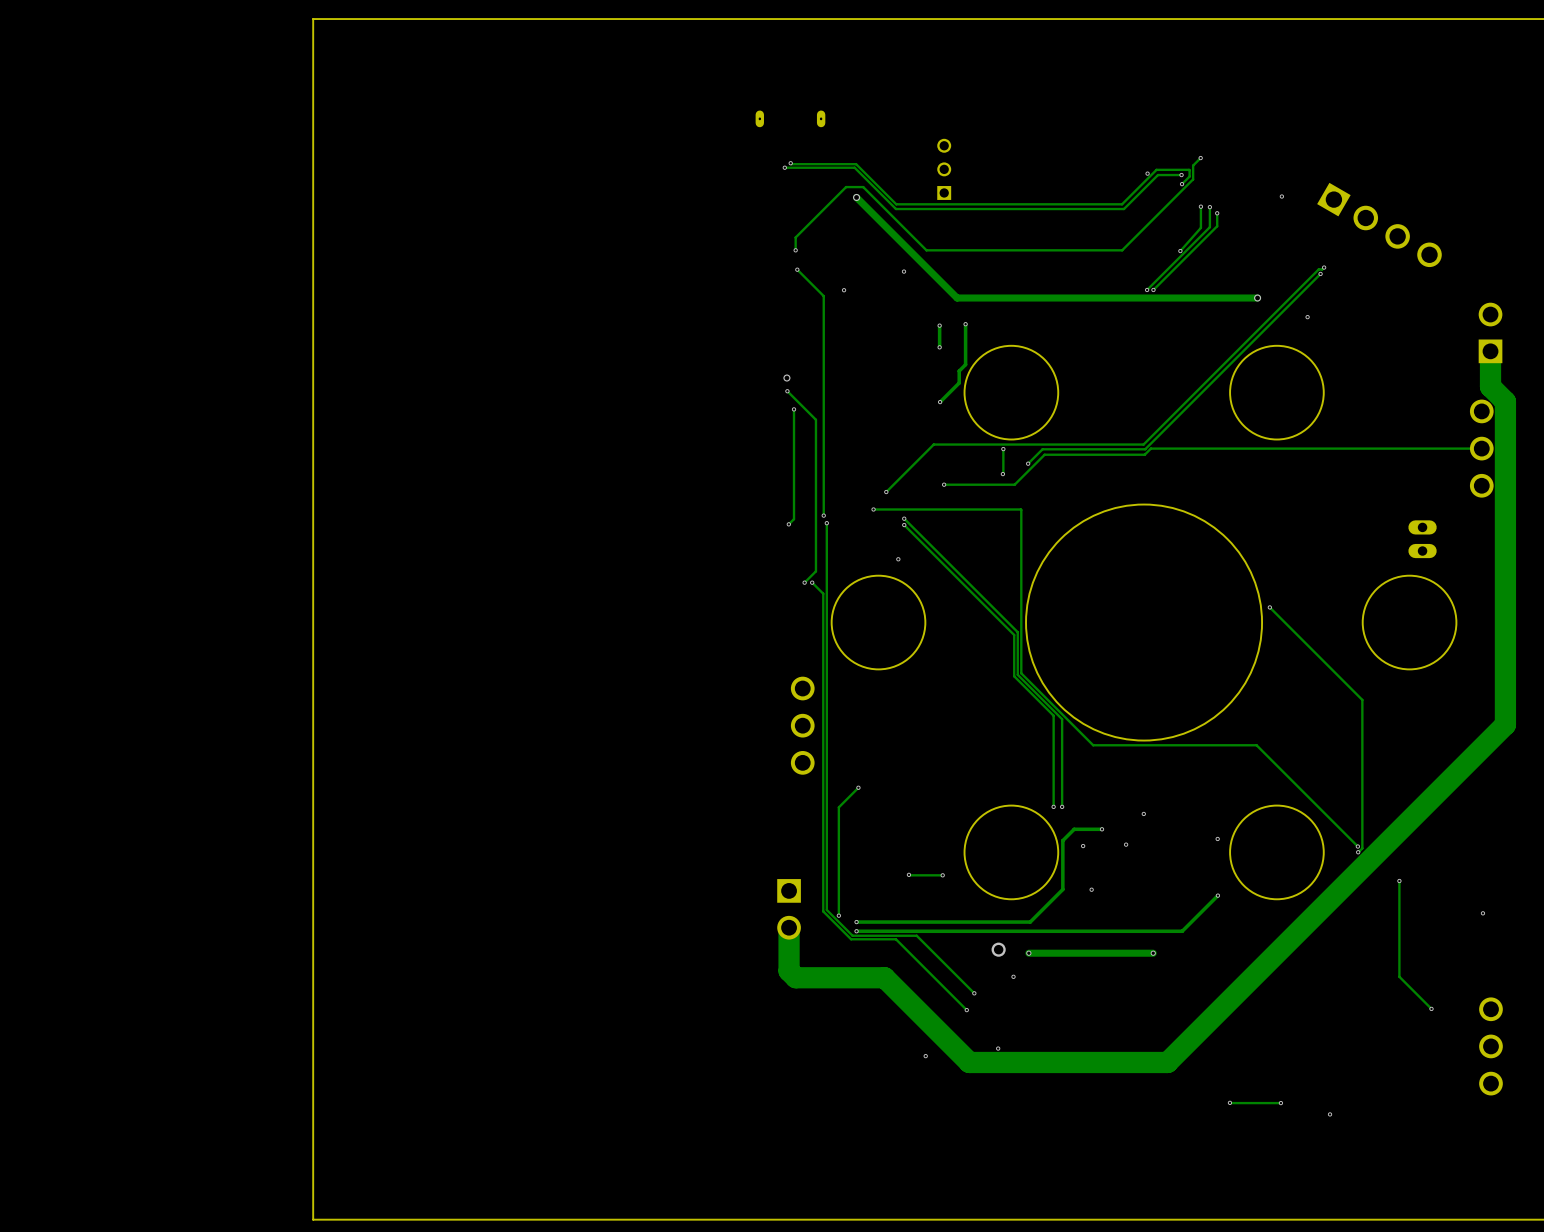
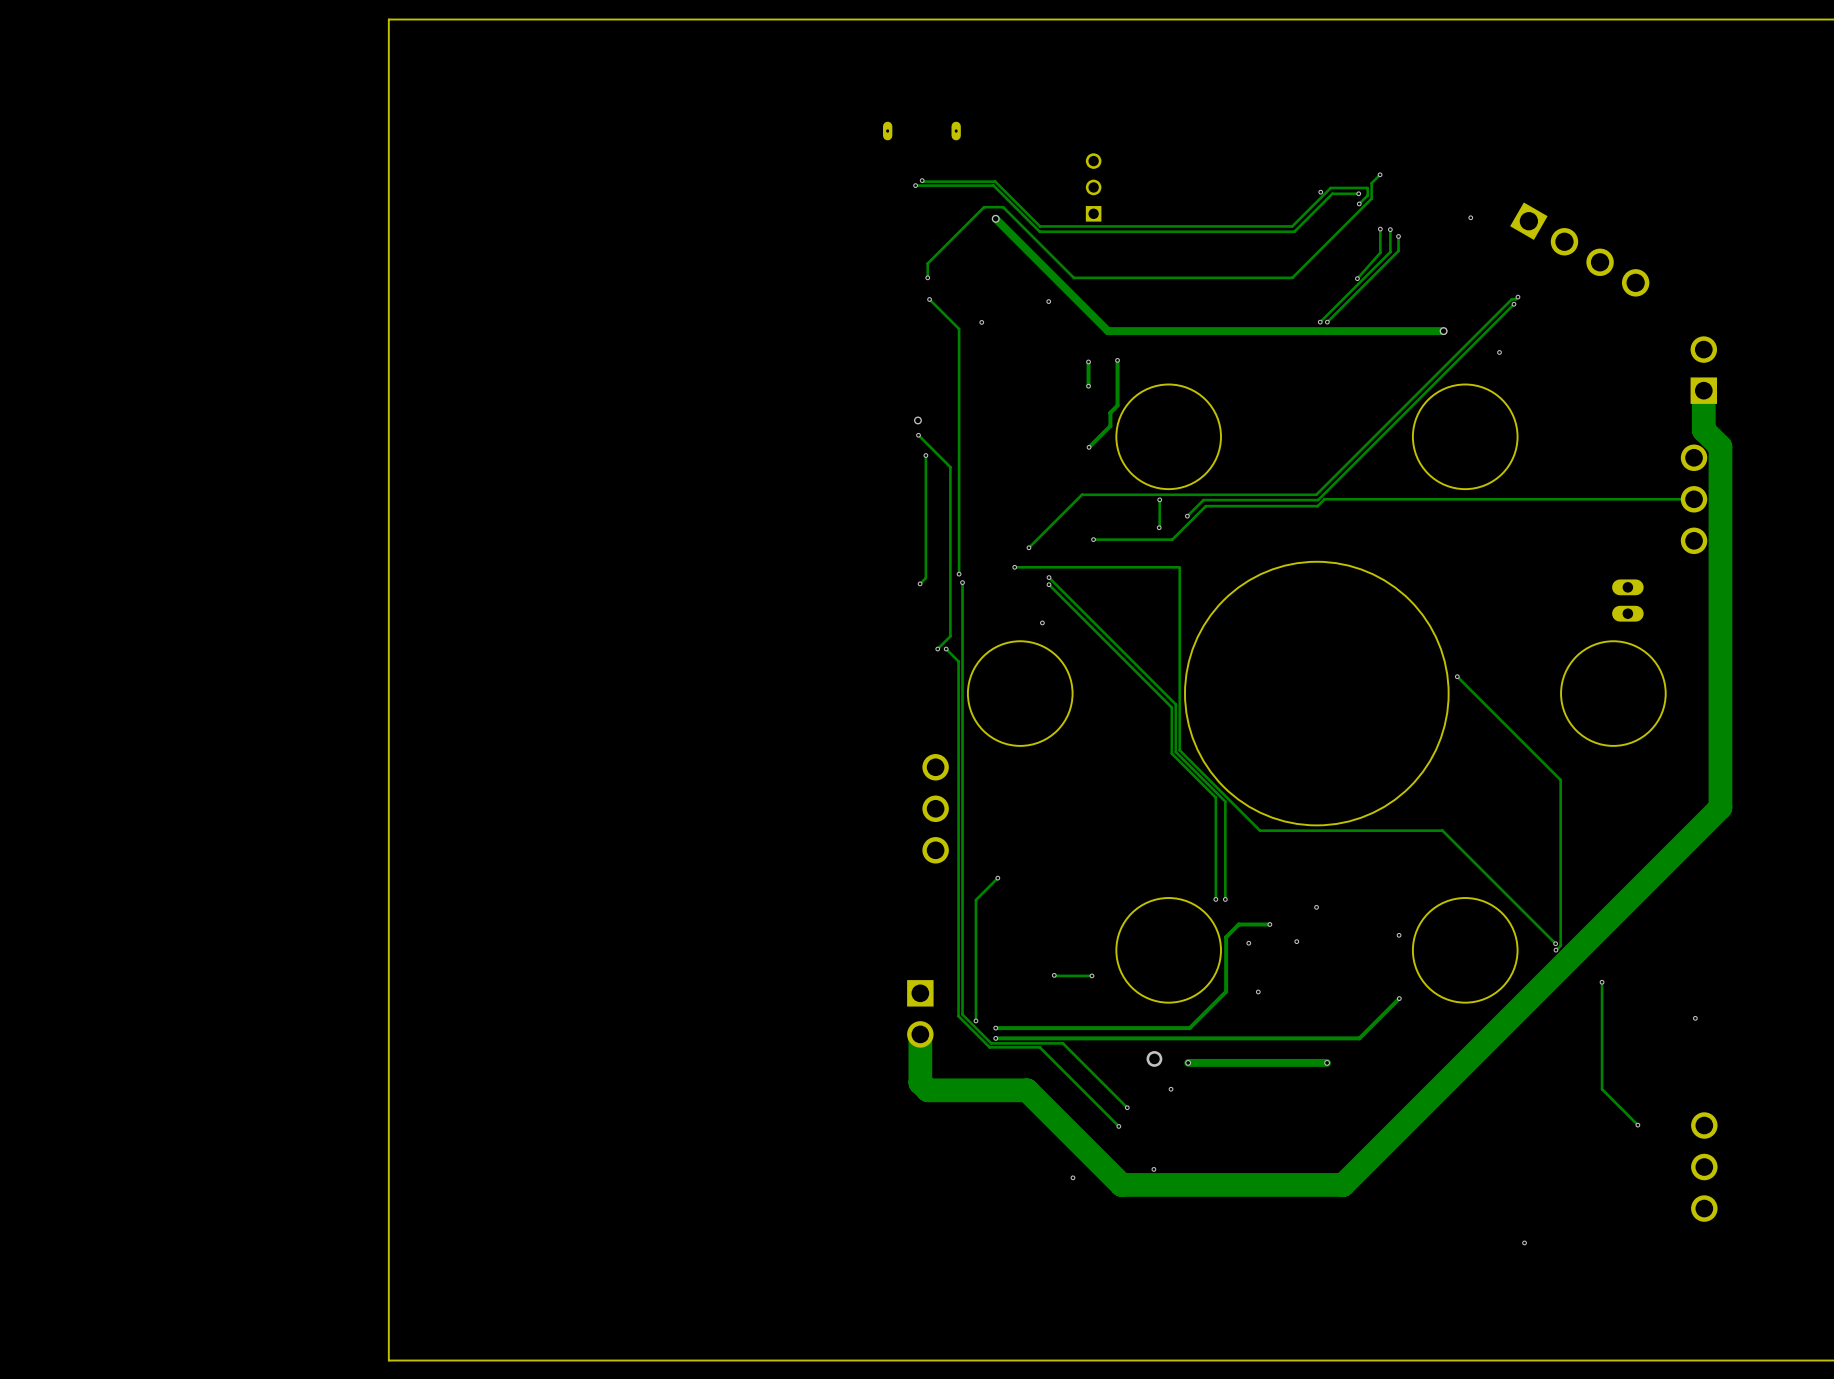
track: (1229, 1102) (1280, 1103) -> none
via: (1229, 1102) -> none
via: (1280, 1103) -> none

